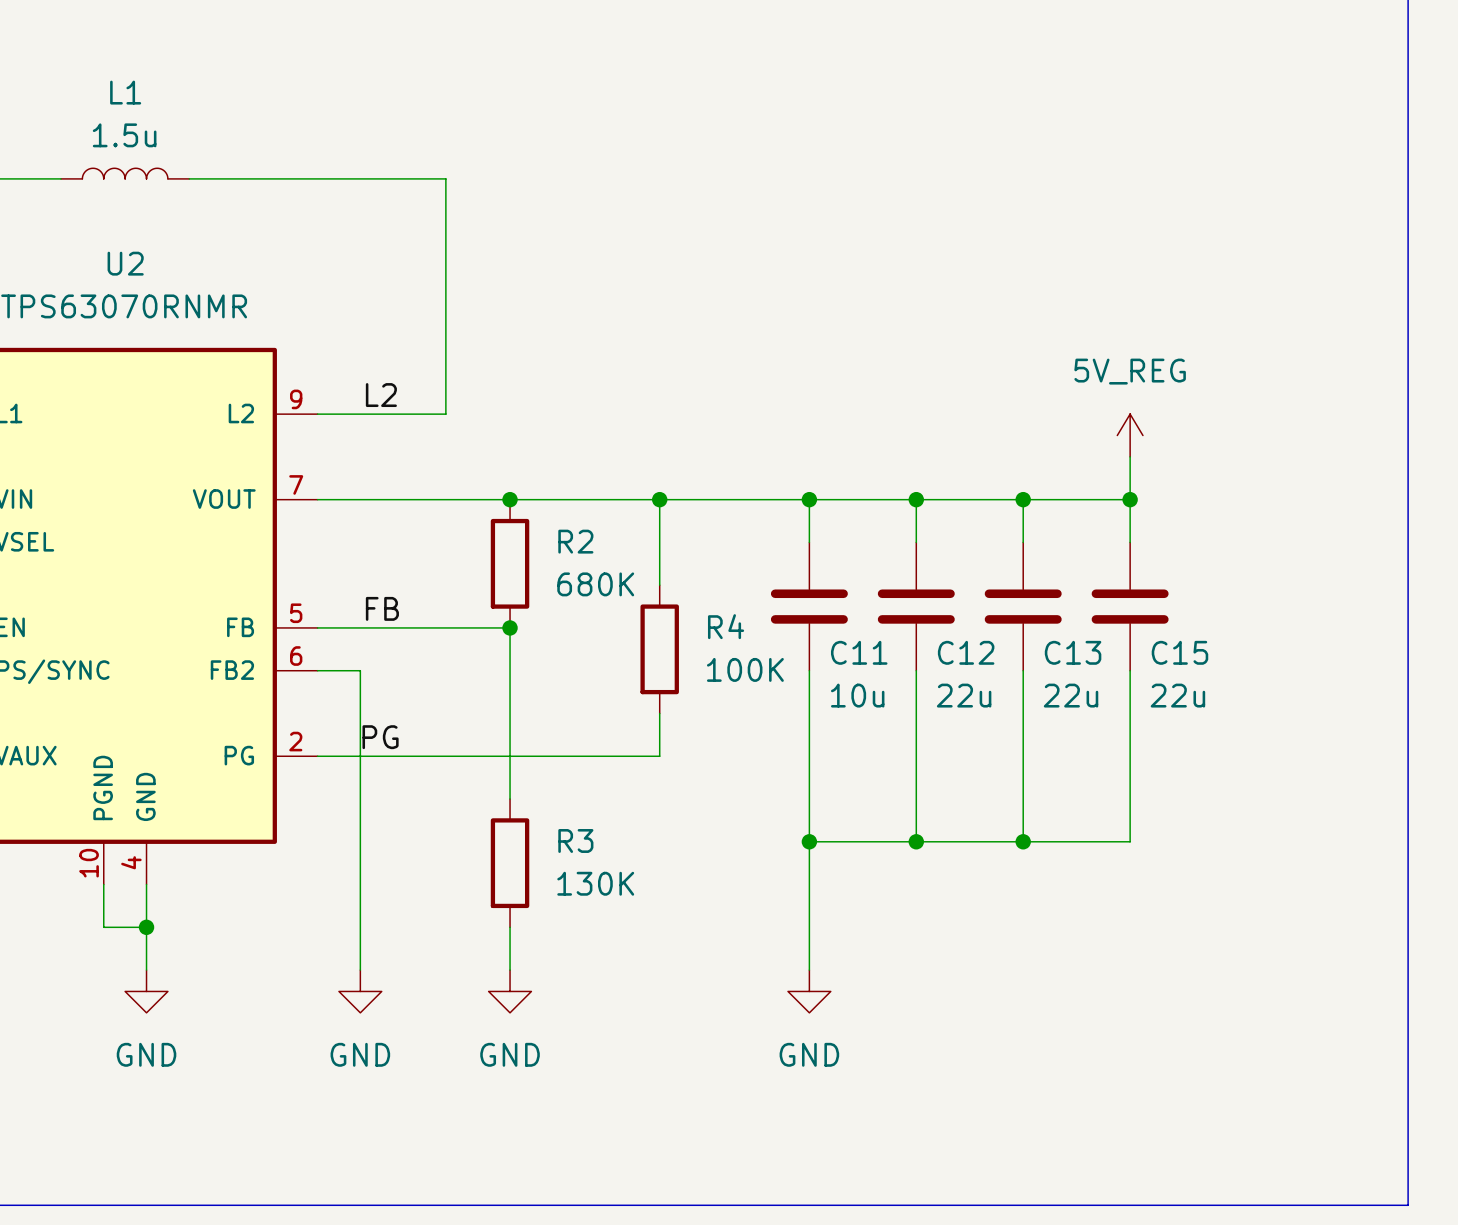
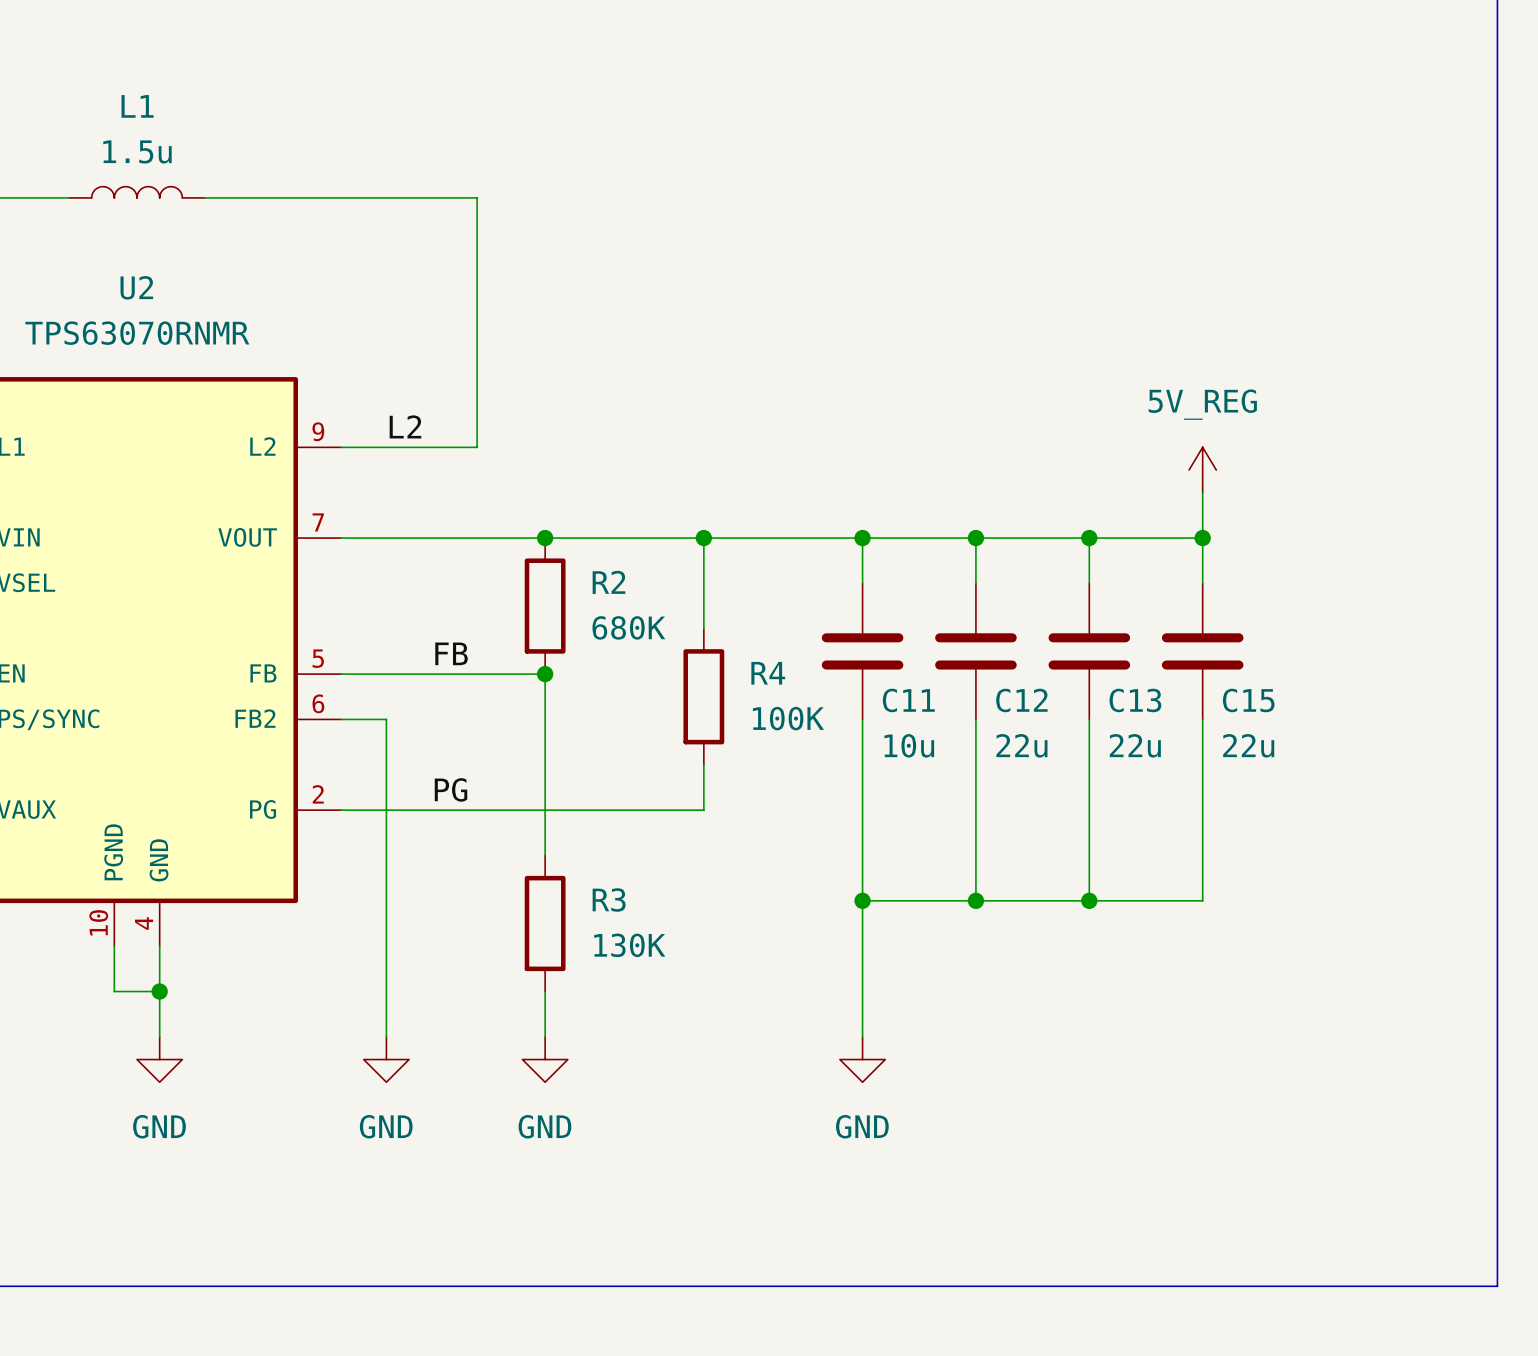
label position: FB (382, 608) -> FB (451, 653)
label position: PG (380, 737) -> PG (451, 789)

